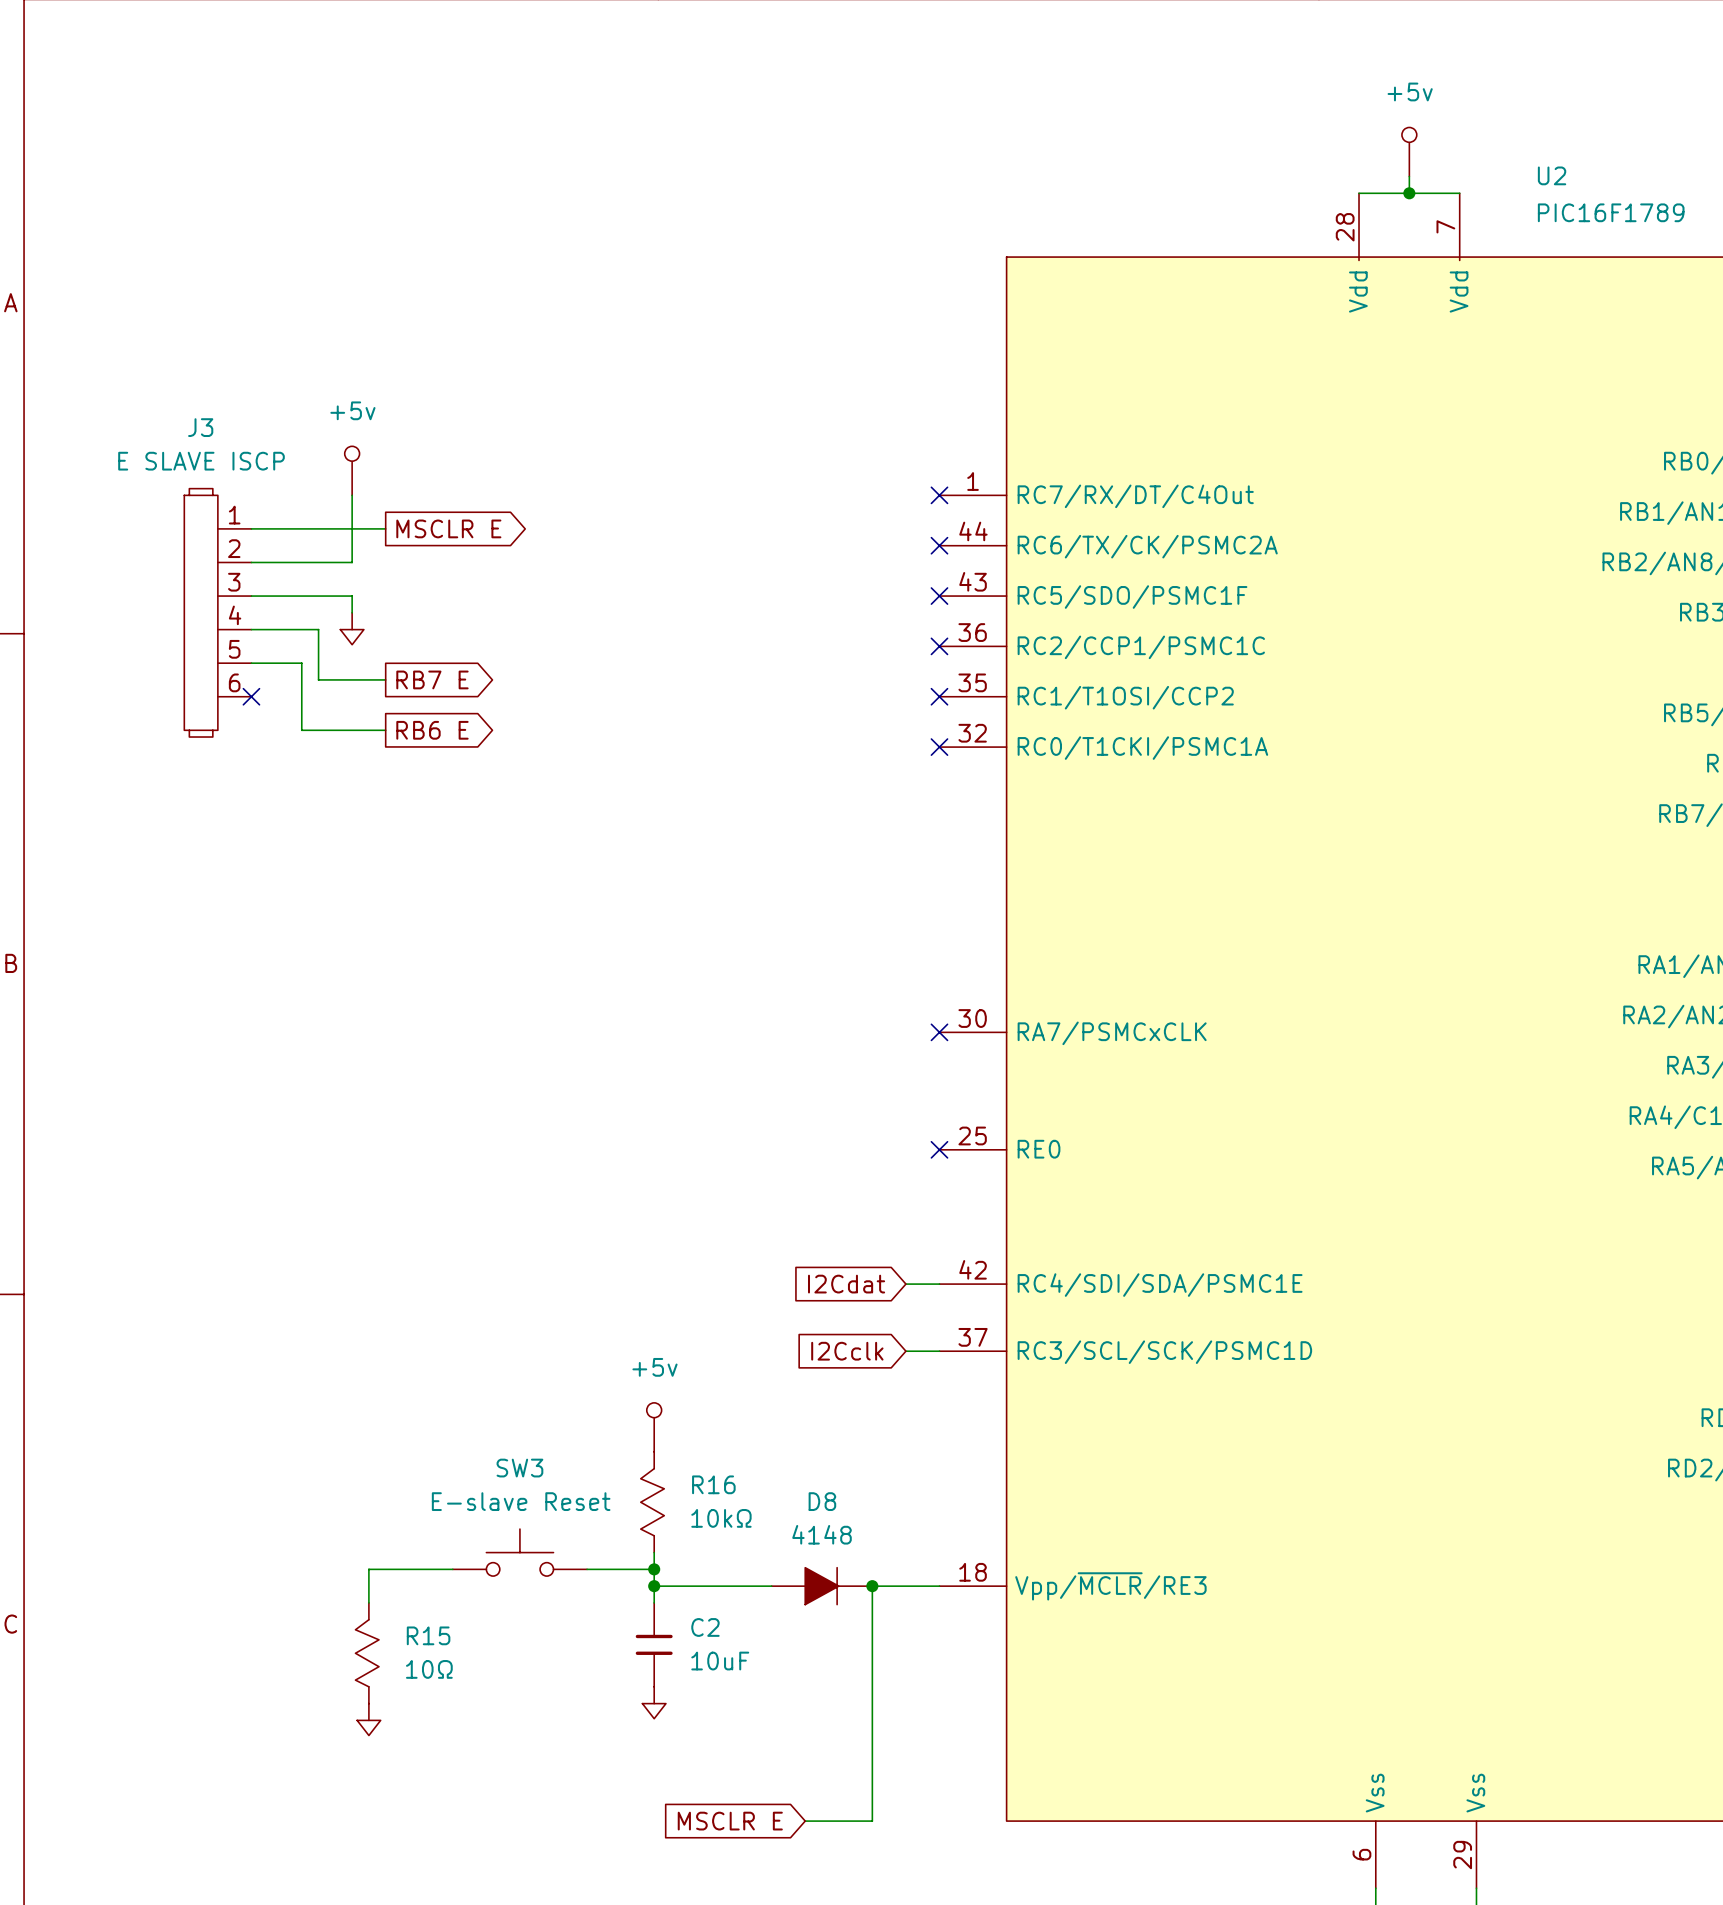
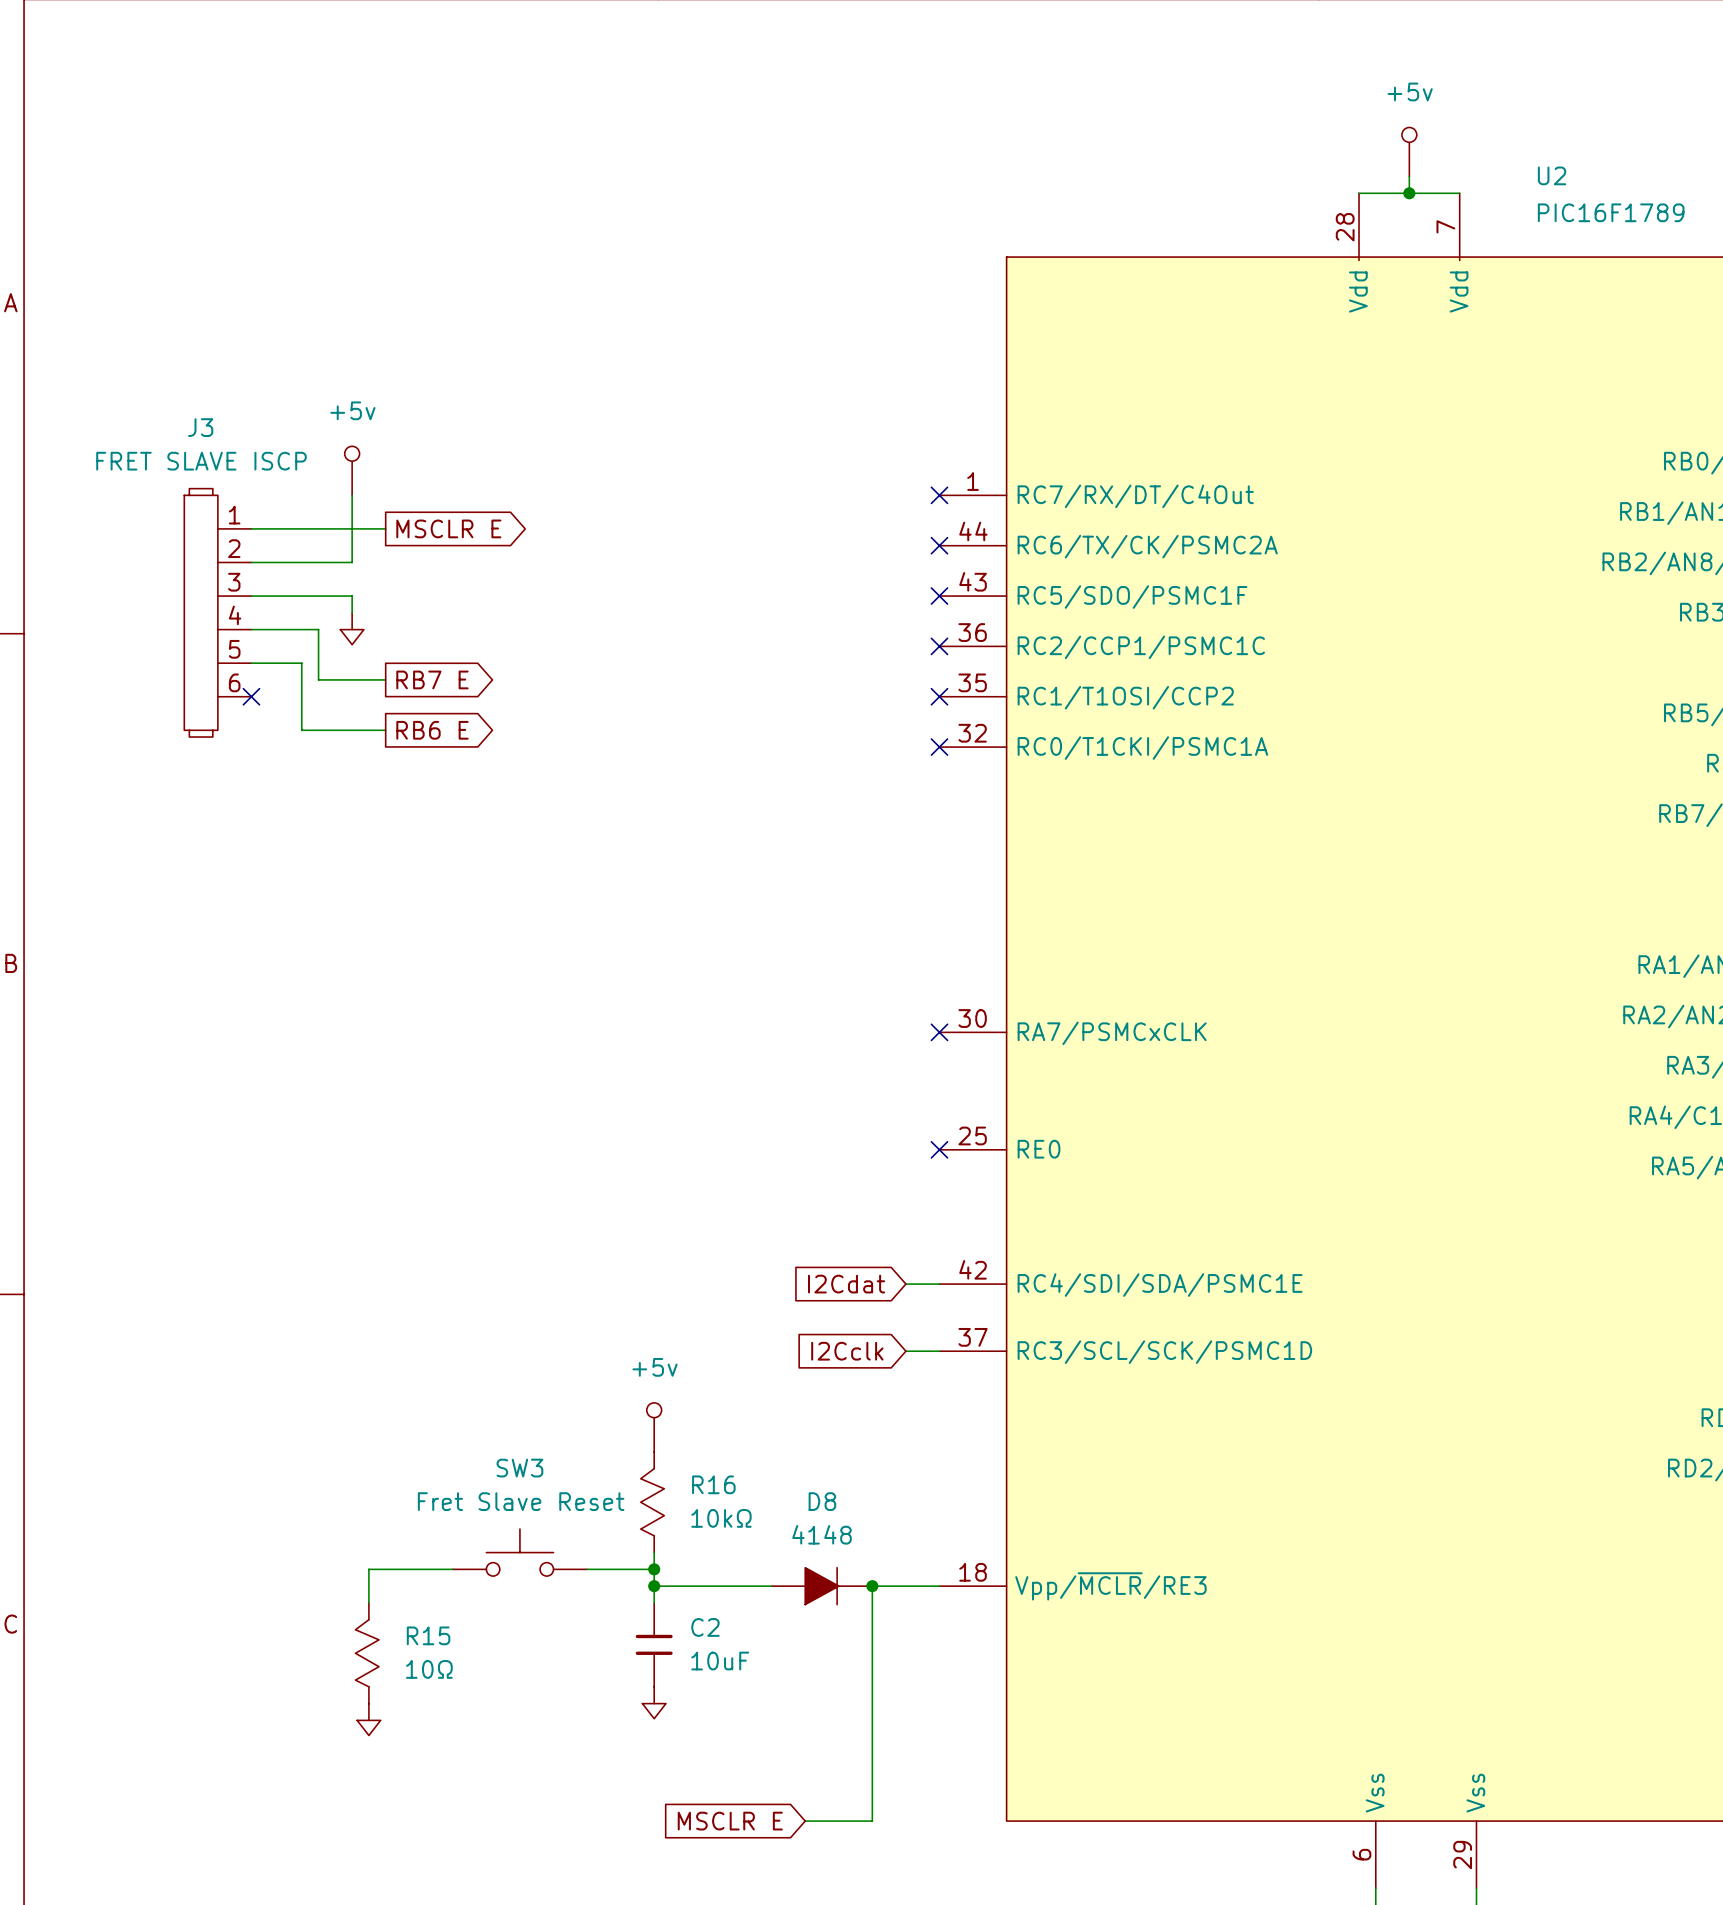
J3 value: E SLAVE ISCP (201, 461) -> FRET SLAVE ISCP (201, 461)
SW3 value: E-slave Reset (521, 1501) -> Fret Slave Reset (521, 1501)

